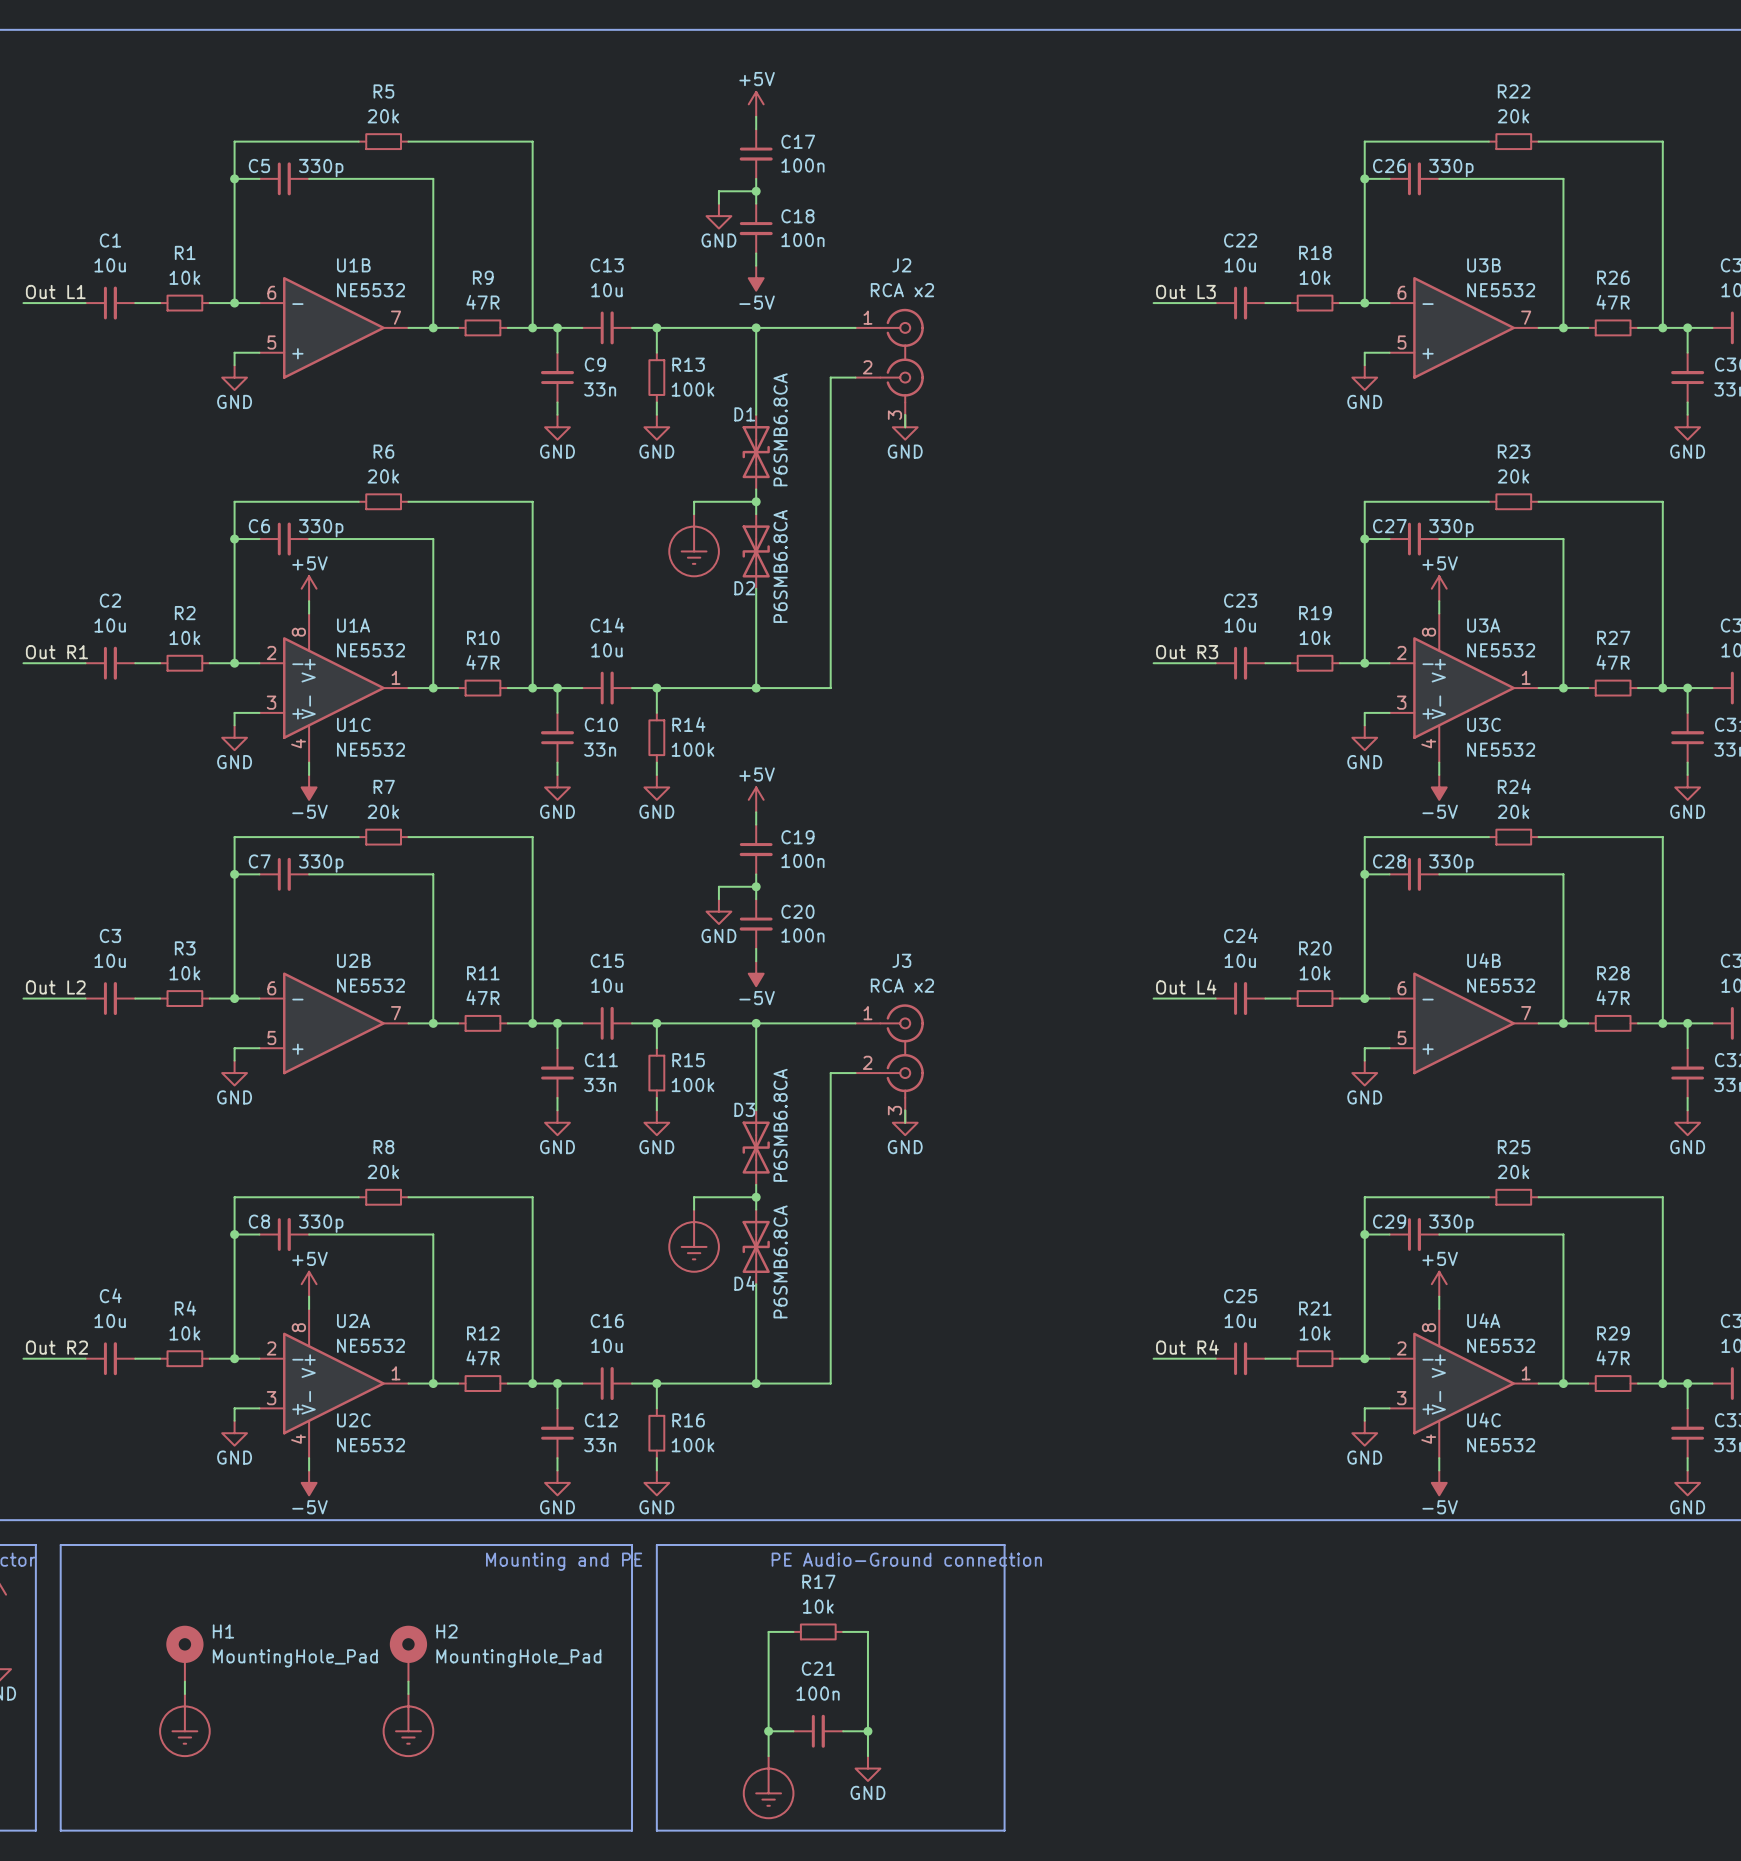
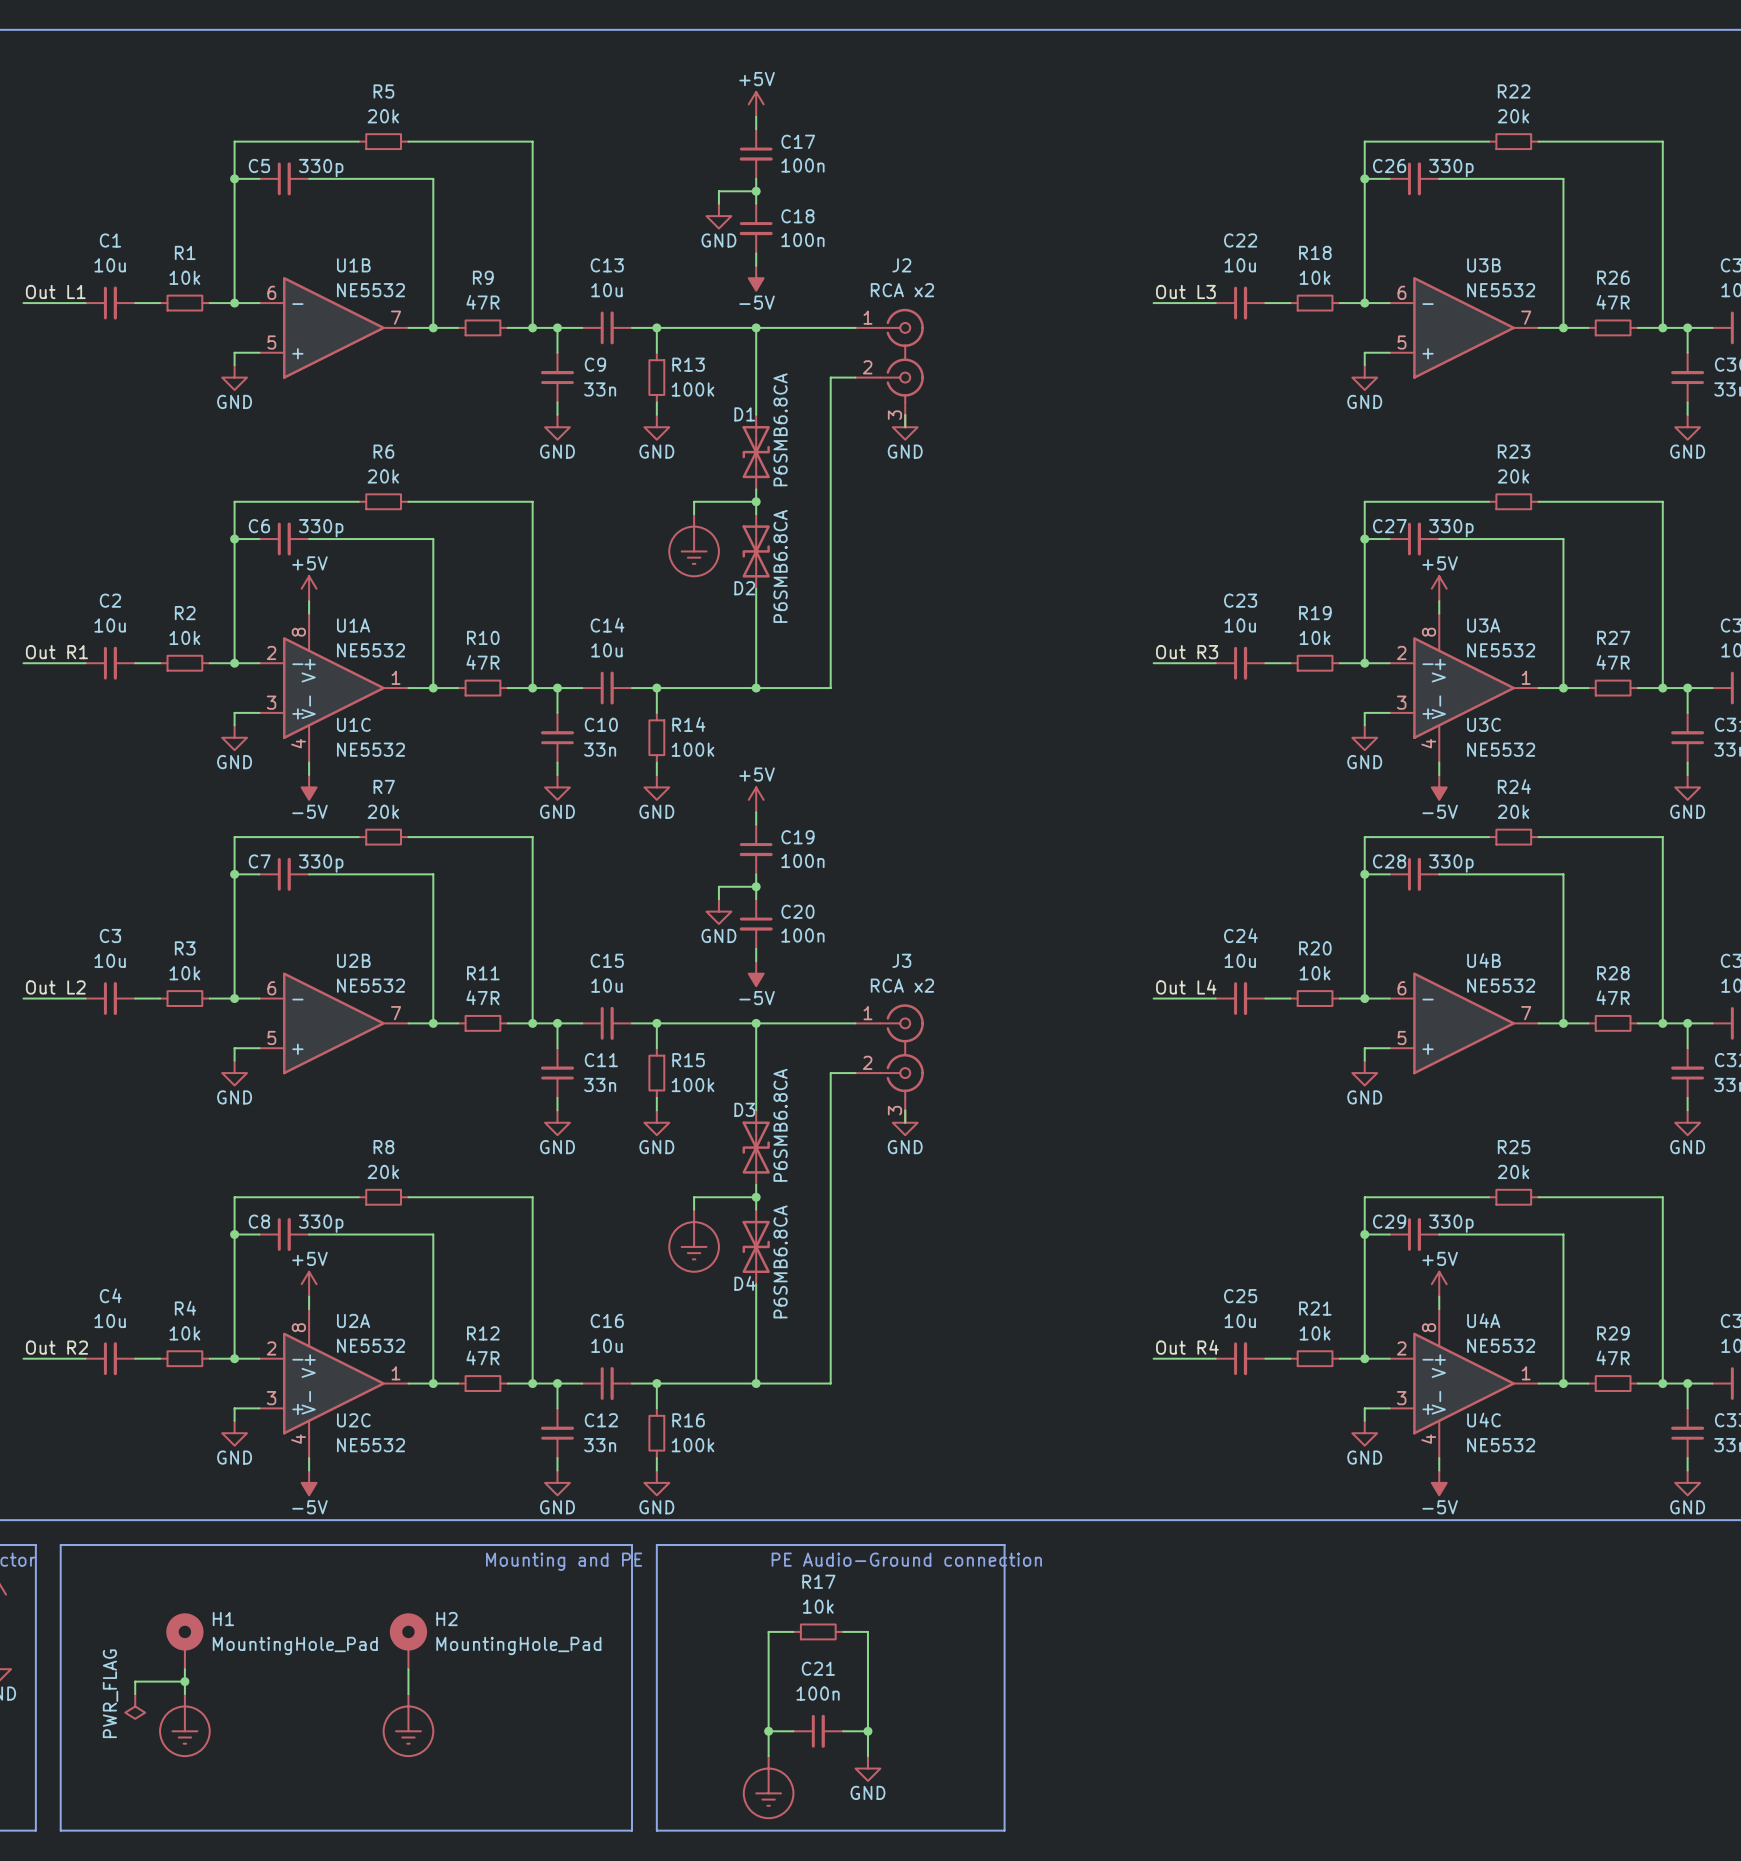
H1 position: (184, 1653) -> (184, 1641)
H2 position: (408, 1653) -> (408, 1641)
wire: none -> (184, 1669) (184, 1681) (135, 1681) (135, 1694)
junction: none -> (184, 1681)
power symbol: none -> PWR_FLAG (135, 1706)

